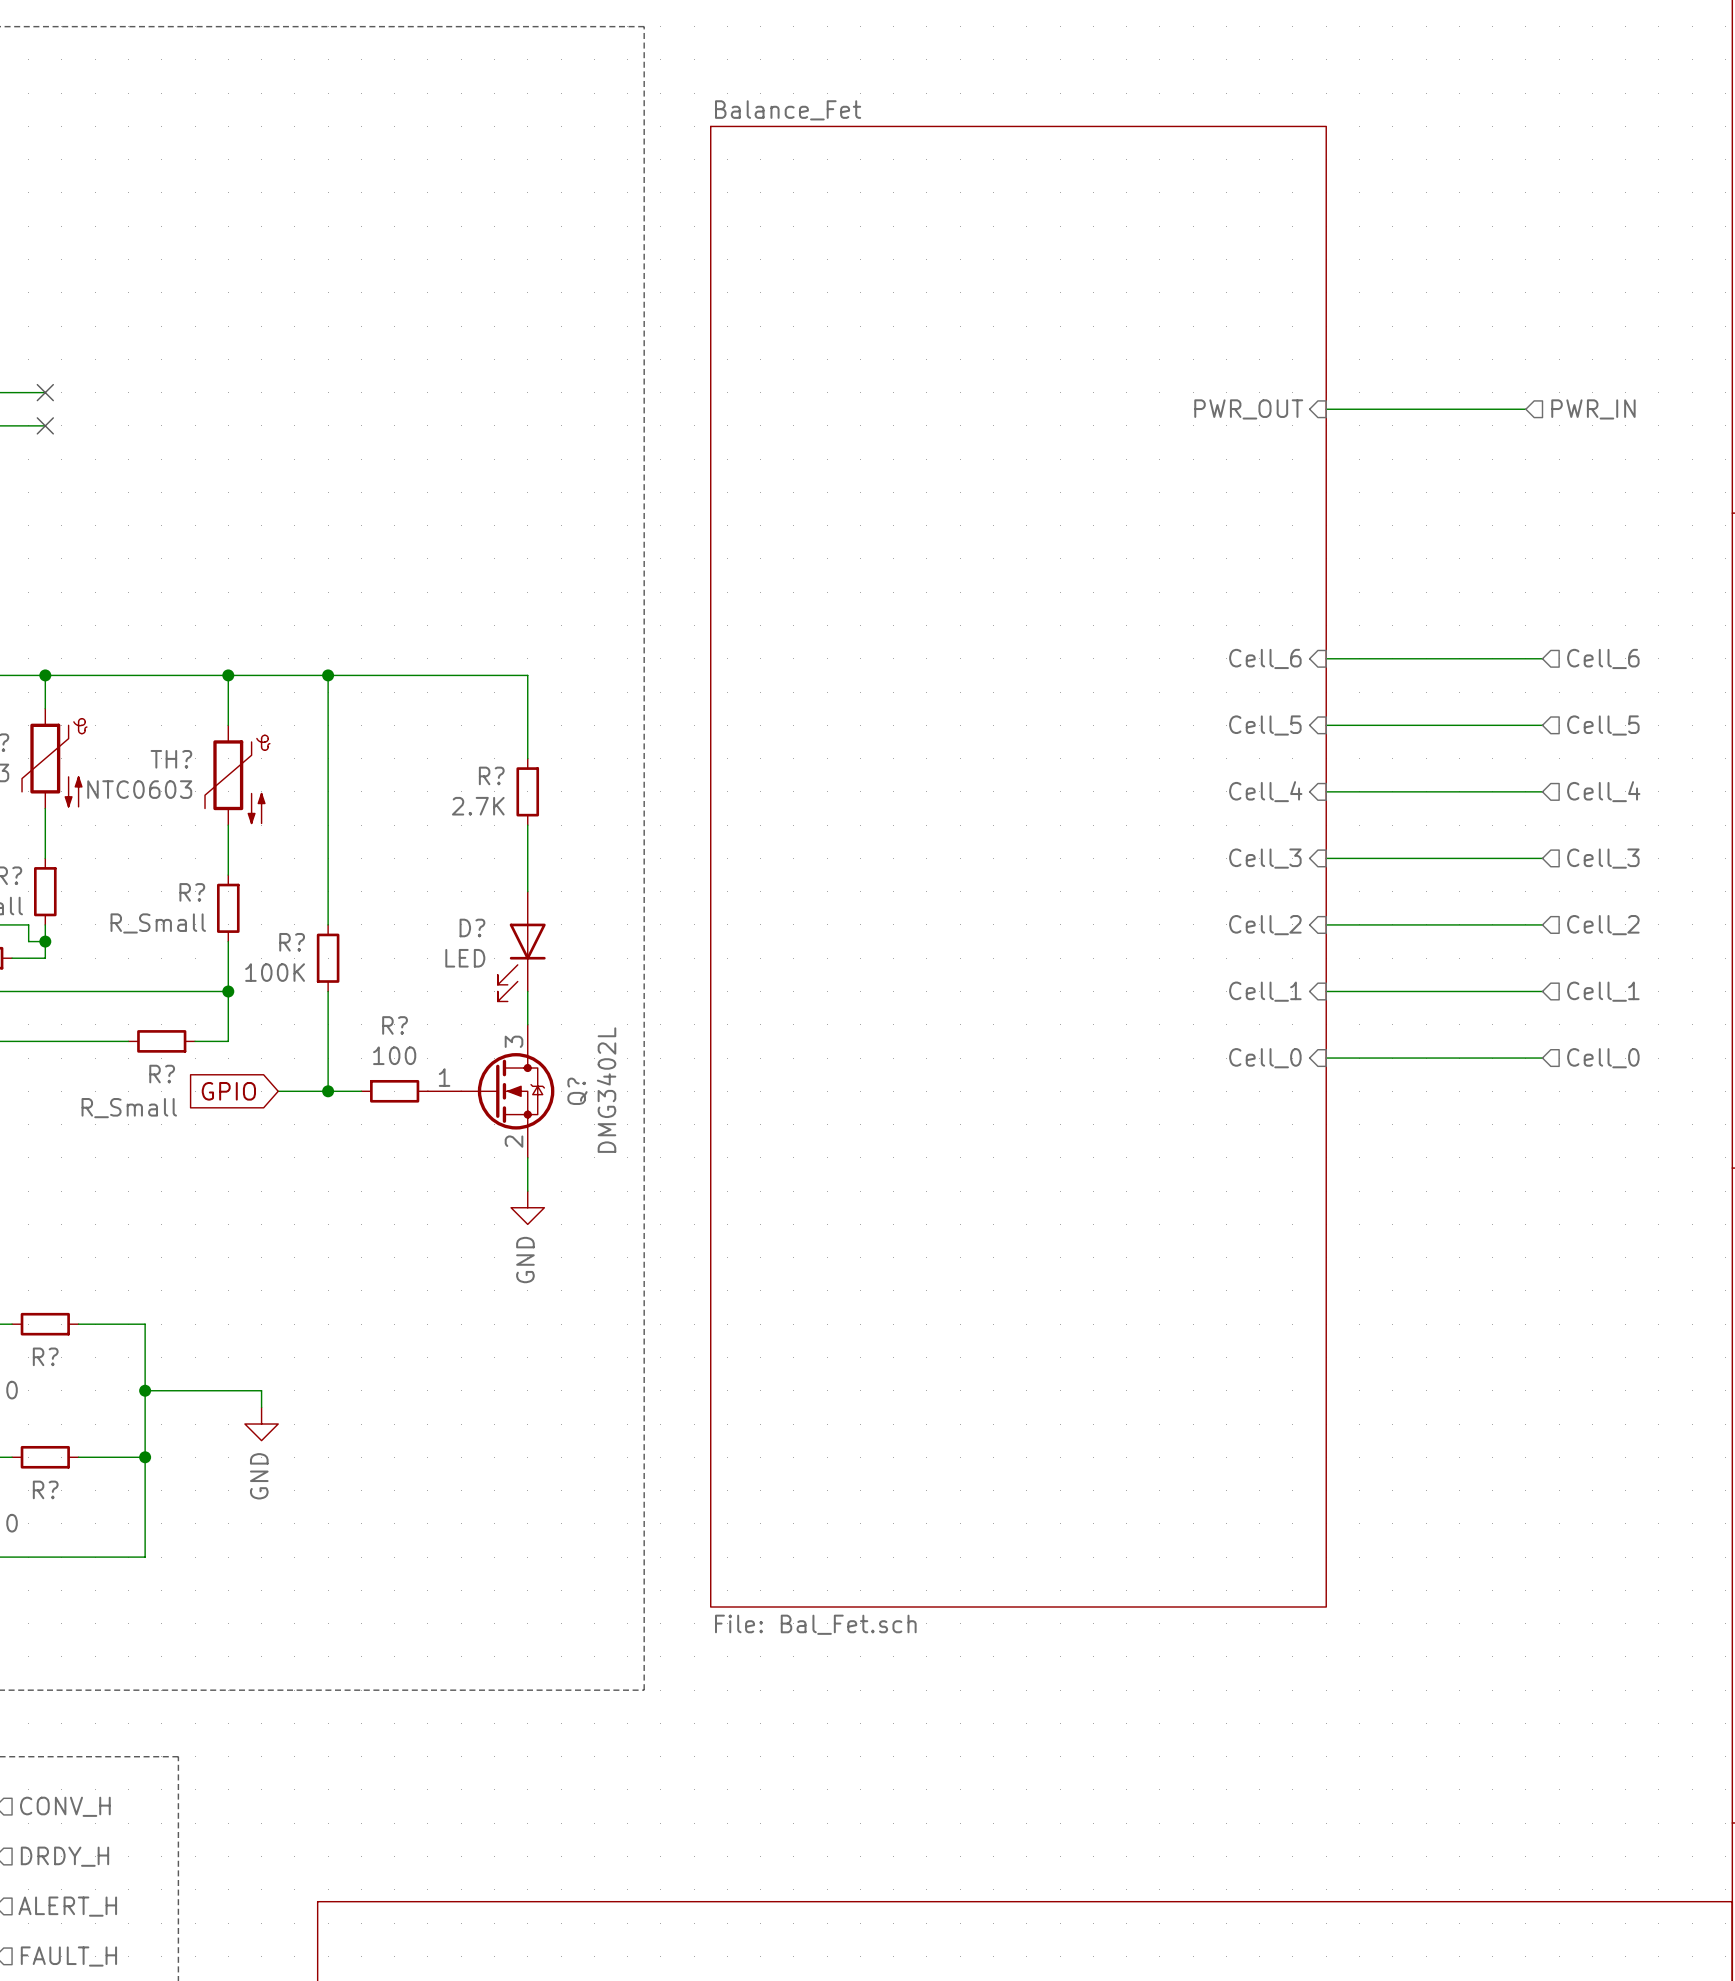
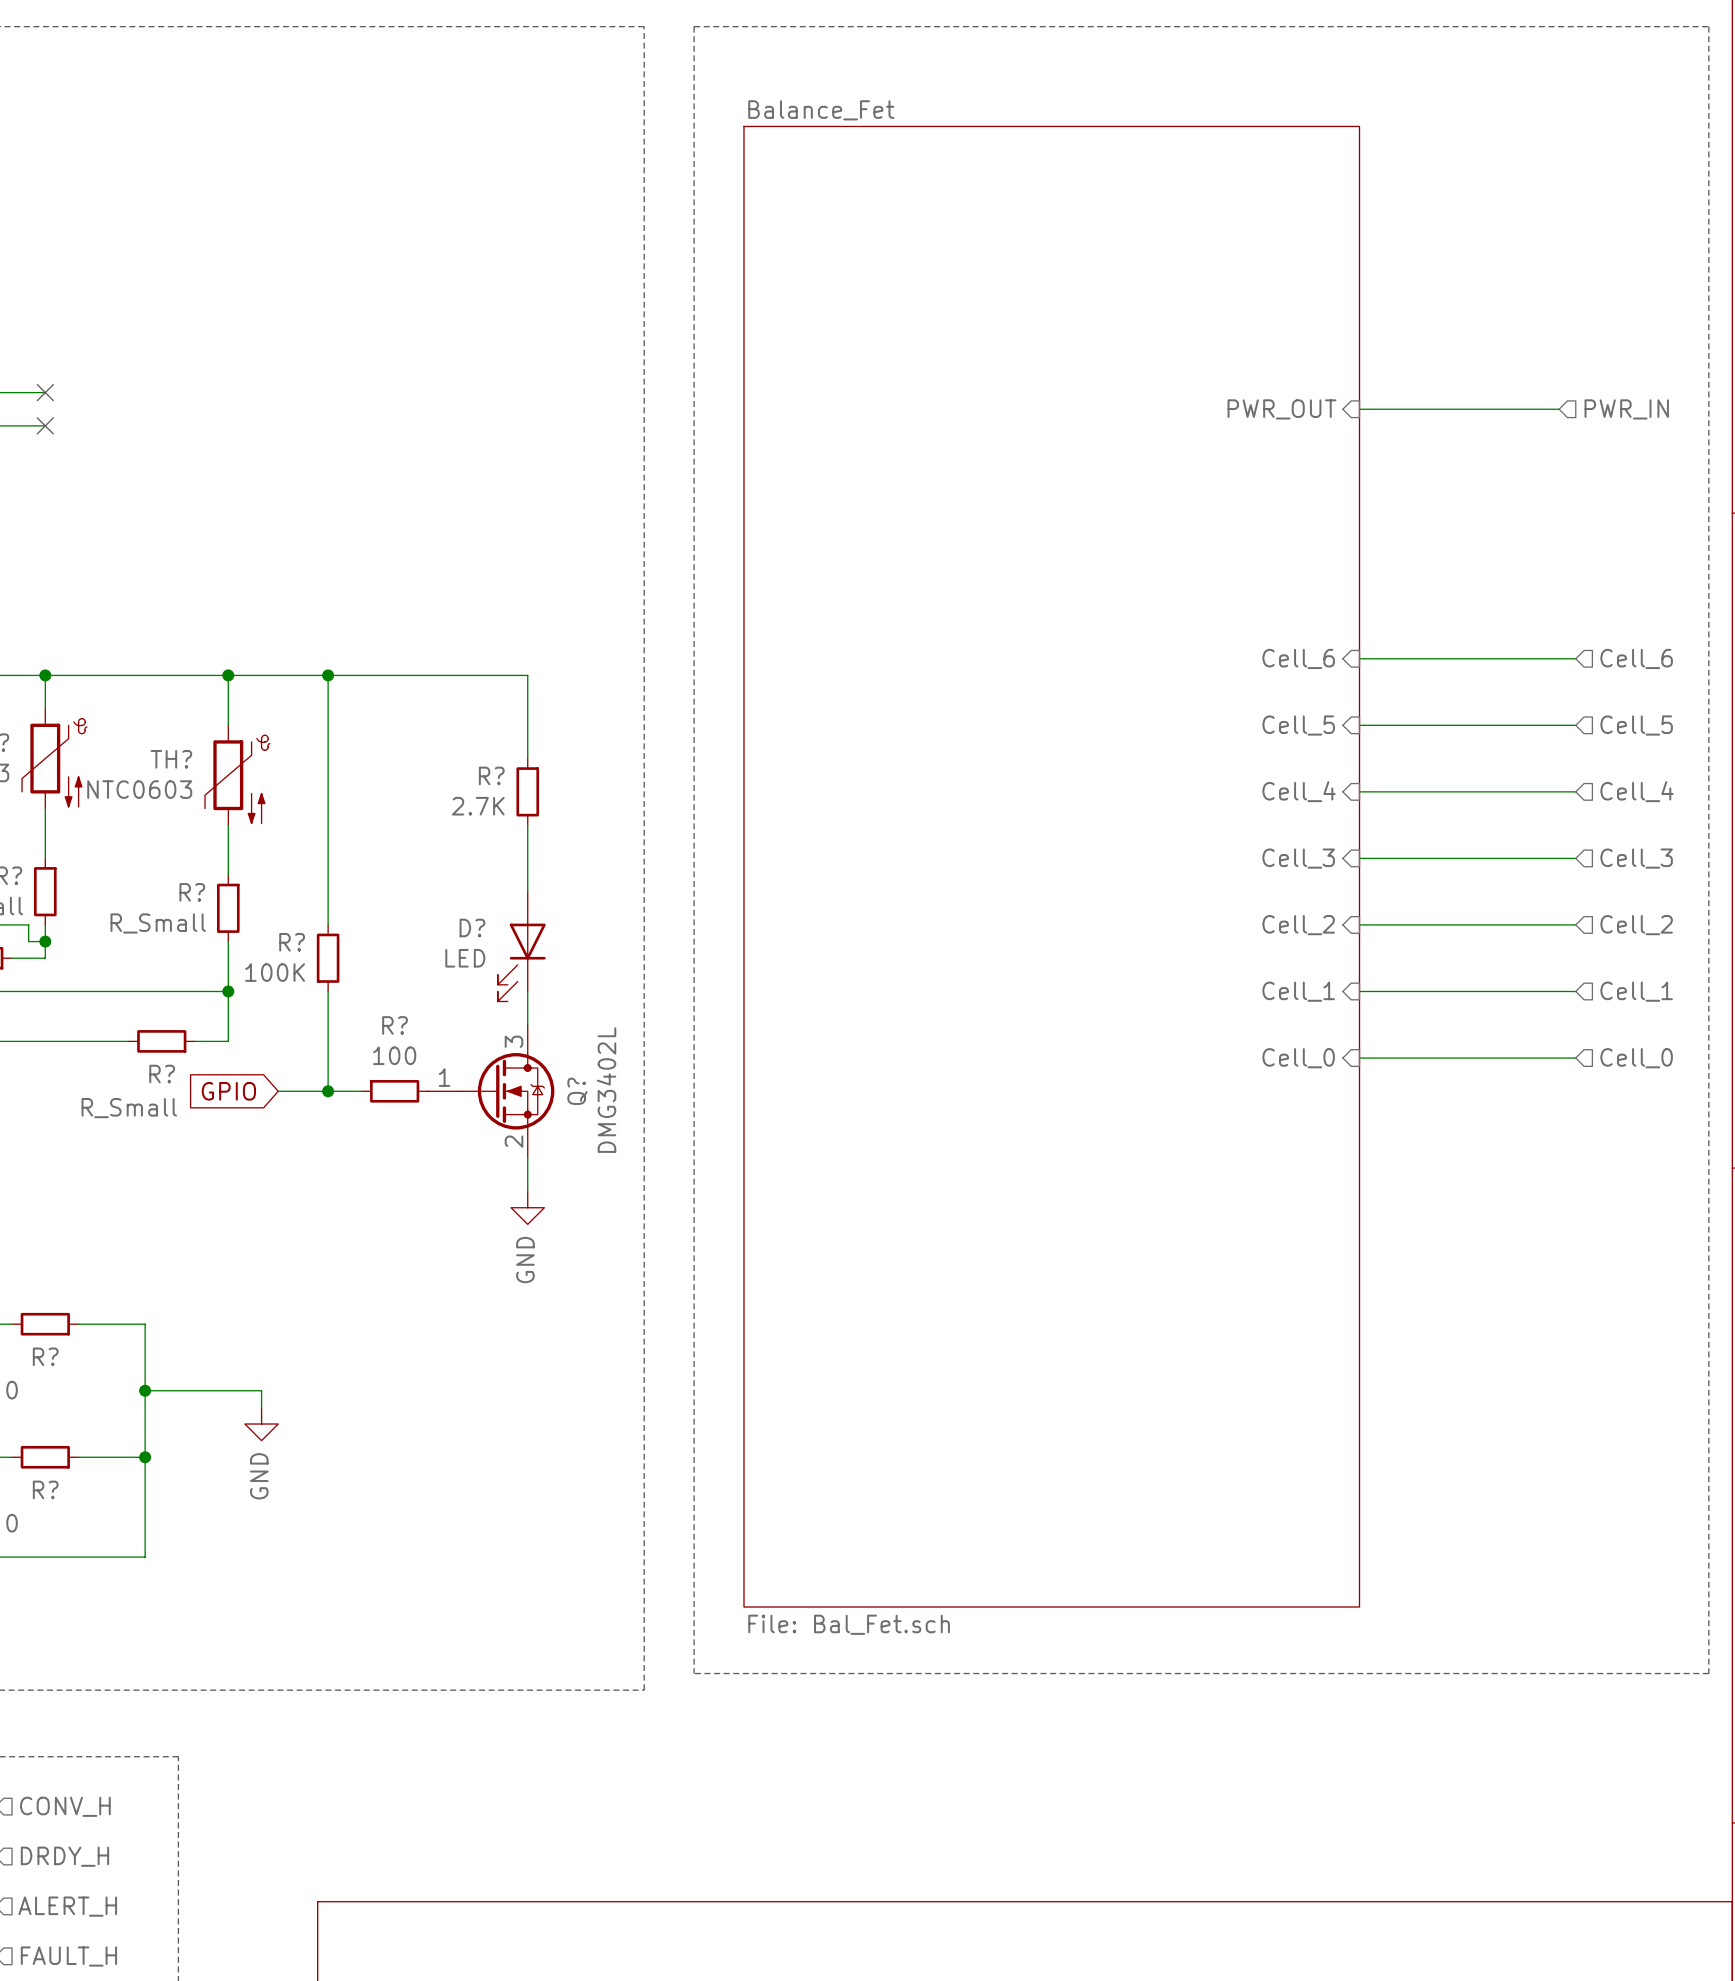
line: none -> (694, 26) (1708, 26) (1708, 1673) (694, 1673) (694, 26)
sheet pin position: PWR_OUT (1248, 409) -> PWR_OUT (1282, 409)
wire: (1326, 409) (1359, 409) -> (1525, 409) (1559, 409)
hierarchical label position: PWR_IN (1593, 409) -> PWR_IN (1626, 409)
sheet pin position: Cell_6 (1265, 658) -> Cell_6 (1298, 658)
wire: (1326, 658) (1359, 658) -> (1542, 658) (1575, 658)
hierarchical label position: Cell_6 (1603, 658) -> Cell_6 (1636, 658)
sheet pin position: Cell_5 (1265, 725) -> Cell_5 (1298, 725)
wire: (1326, 725) (1359, 725) -> (1542, 725) (1575, 725)
hierarchical label position: Cell_5 (1603, 725) -> Cell_5 (1636, 725)
sheet pin position: Cell_4 (1265, 791) -> Cell_4 (1299, 791)
wire: (1326, 791) (1359, 791) -> (1542, 791) (1575, 791)
hierarchical label position: Cell_4 (1603, 791) -> Cell_4 (1637, 791)
sheet pin position: Cell_3 (1265, 858) -> Cell_3 (1298, 858)
wire: (1326, 858) (1359, 858) -> (1542, 858) (1575, 858)
hierarchical label position: Cell_3 (1603, 858) -> Cell_3 (1636, 858)
sheet Balance_Fet position: (1018, 866) -> (1051, 866)
wire: (1326, 924) (1359, 924) -> (1542, 924) (1575, 924)
sheet pin position: Cell_2 (1265, 925) -> Cell_2 (1298, 925)
hierarchical label position: Cell_2 (1603, 925) -> Cell_2 (1636, 925)
sheet pin position: Cell_1 (1265, 991) -> Cell_1 (1298, 991)
wire: (1326, 991) (1359, 991) -> (1542, 991) (1575, 991)
hierarchical label position: Cell_1 (1603, 991) -> Cell_1 (1636, 991)
sheet pin position: Cell_0 (1265, 1058) -> Cell_0 (1298, 1058)
wire: (1326, 1058) (1359, 1058) -> (1542, 1058) (1575, 1058)
hierarchical label position: Cell_0 (1603, 1058) -> Cell_0 (1636, 1058)

